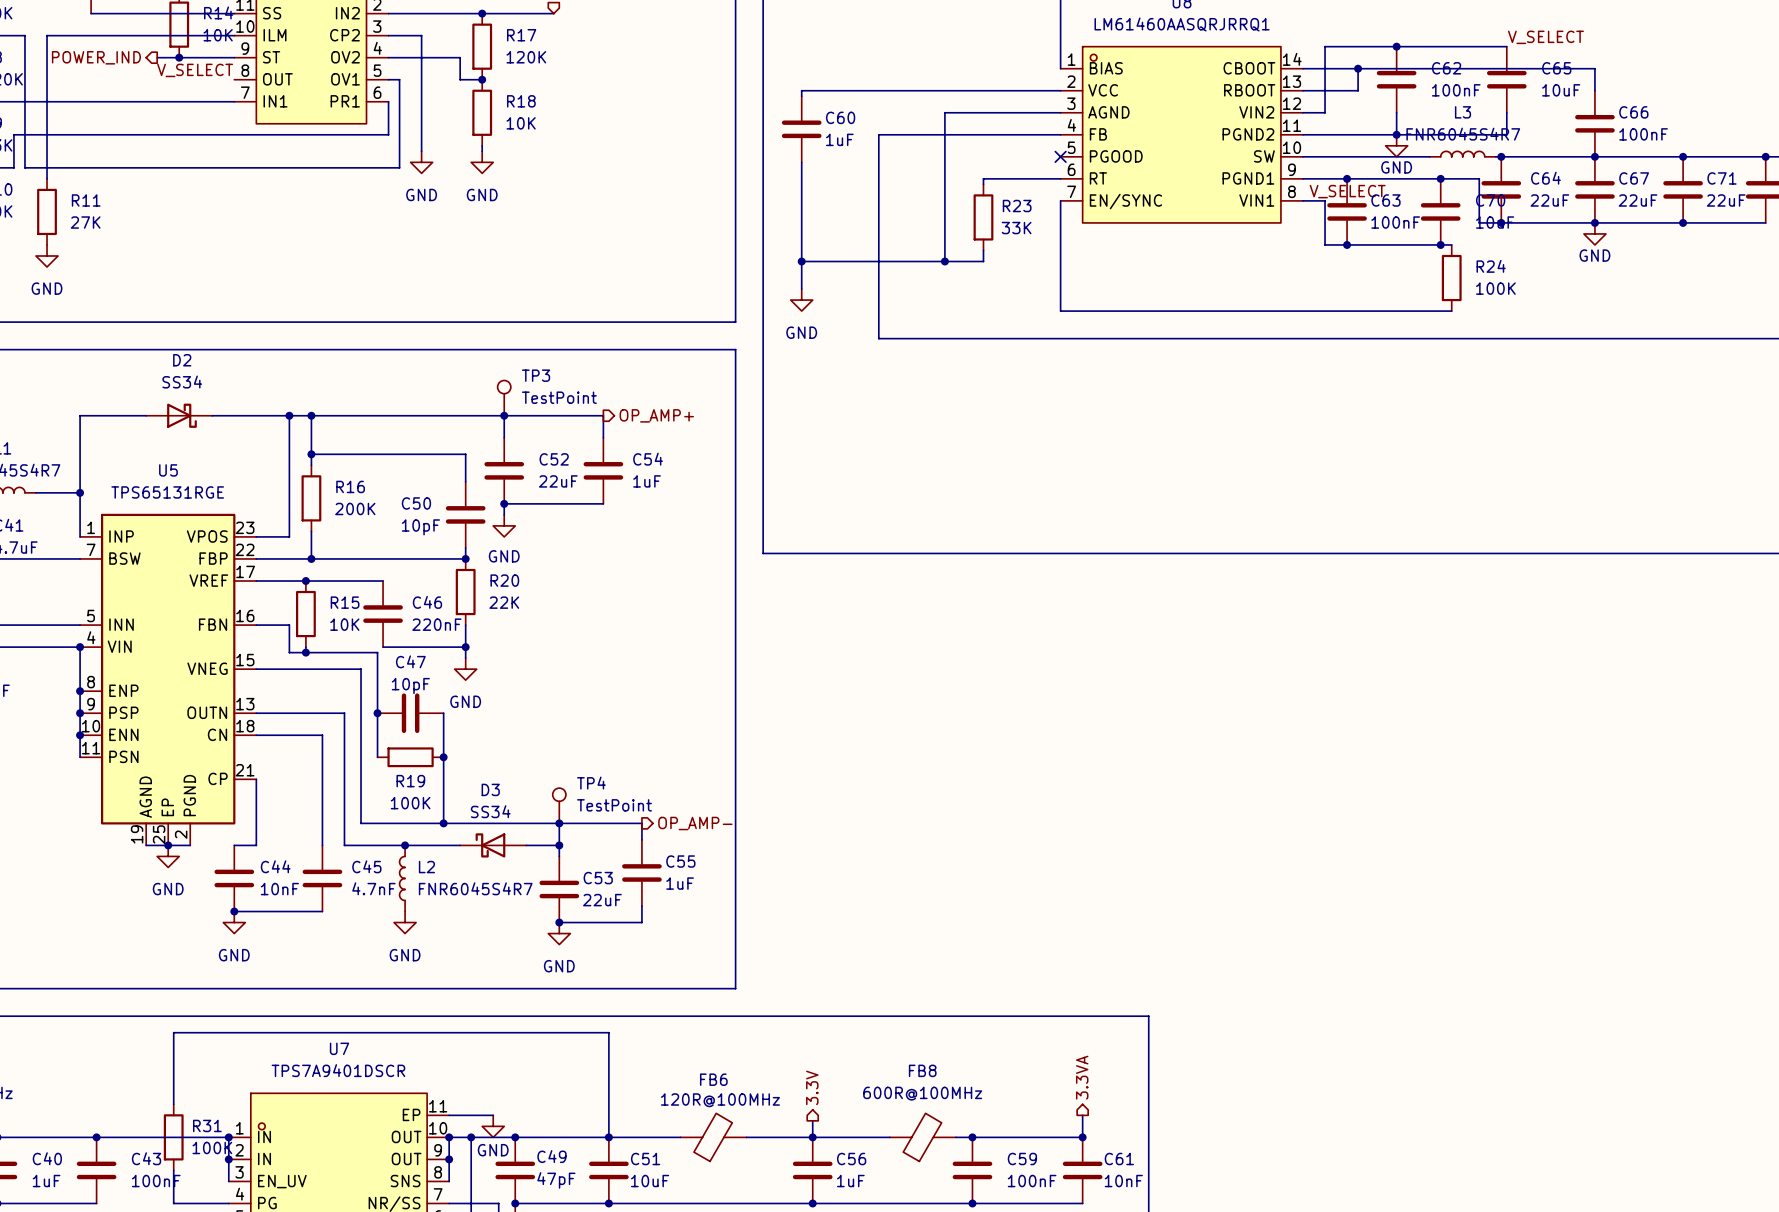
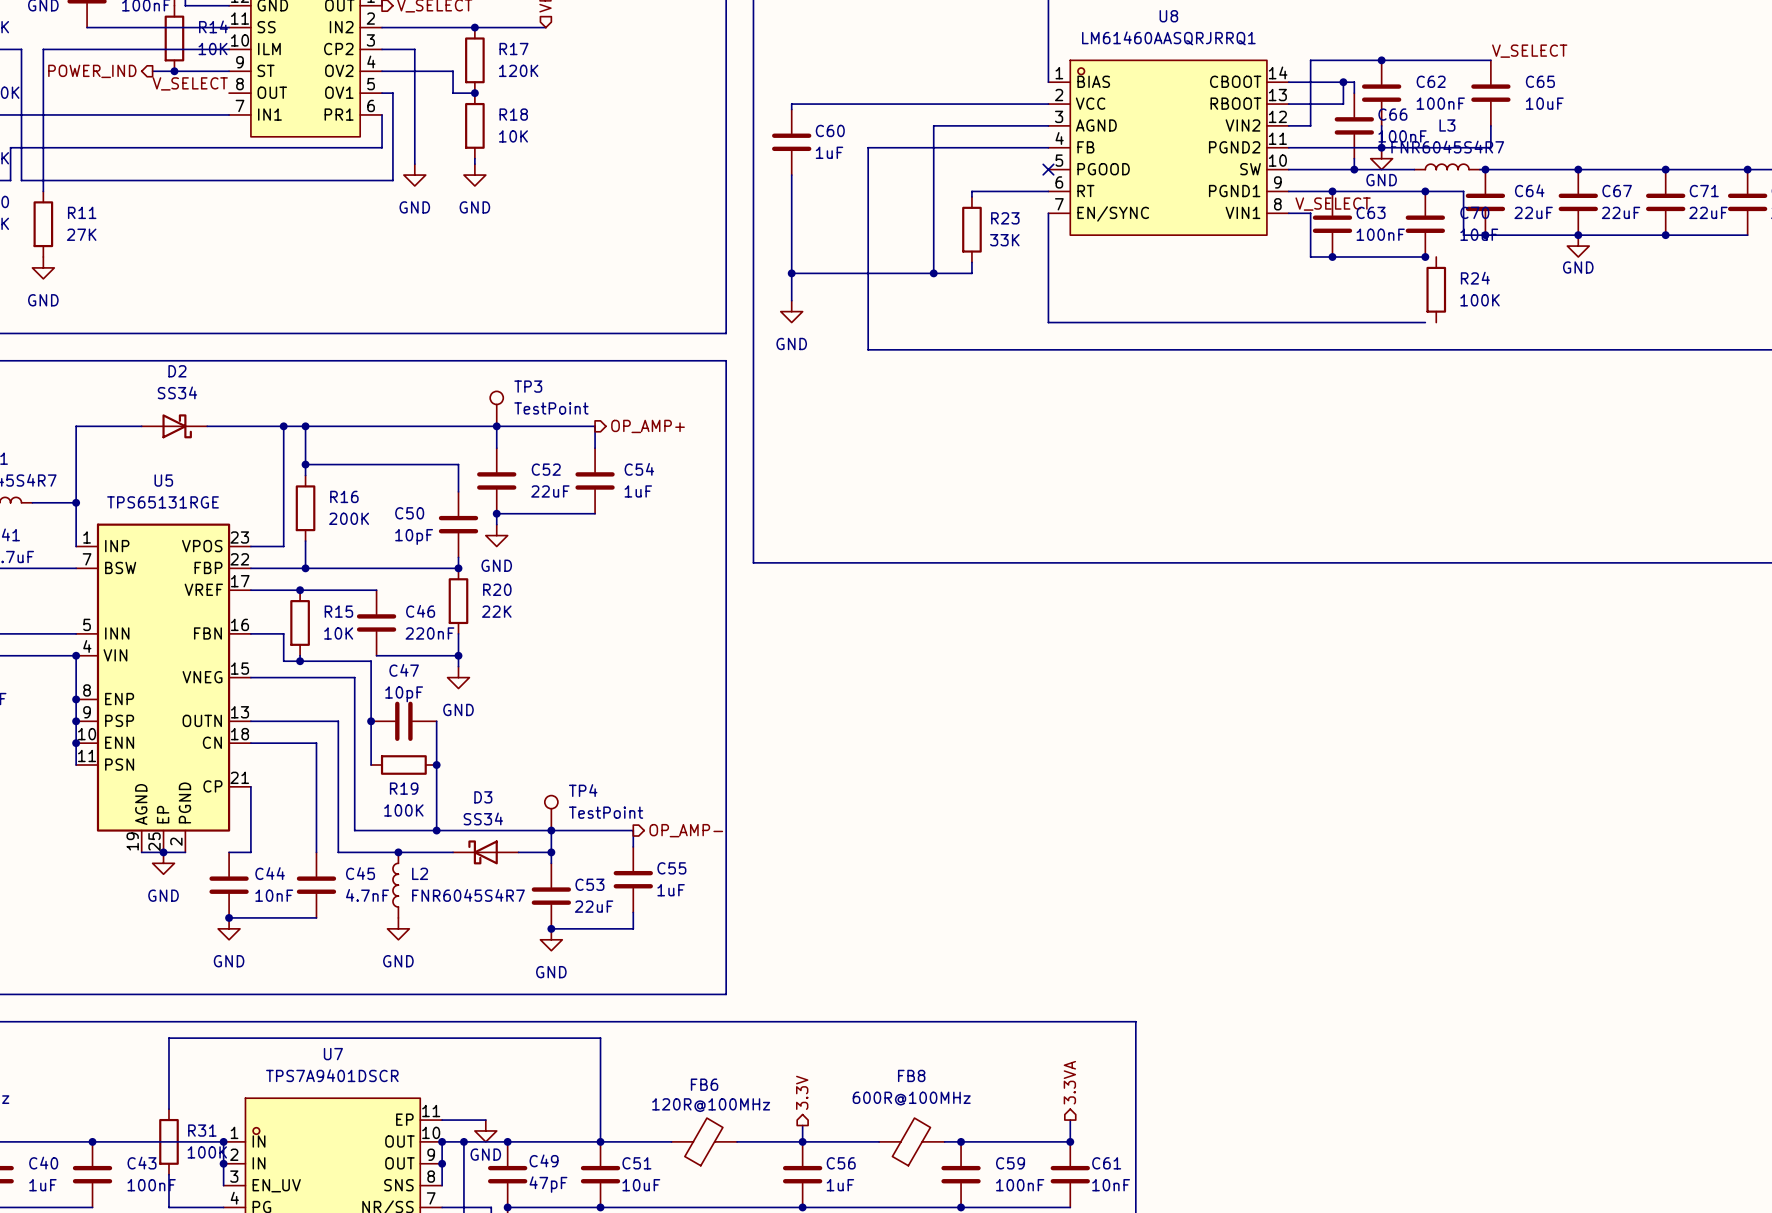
wire: (1369, 68) (1594, 68) (1594, 90) -> (1354, 82) (1354, 93)
C66 position: (1594, 123) -> (1354, 125)
wire: none -> (1354, 158) (1354, 169)
junction: none -> (1354, 169)
wire: (1440, 244) (1451, 244) -> none
wire: (1440, 311) (1451, 311) -> none

